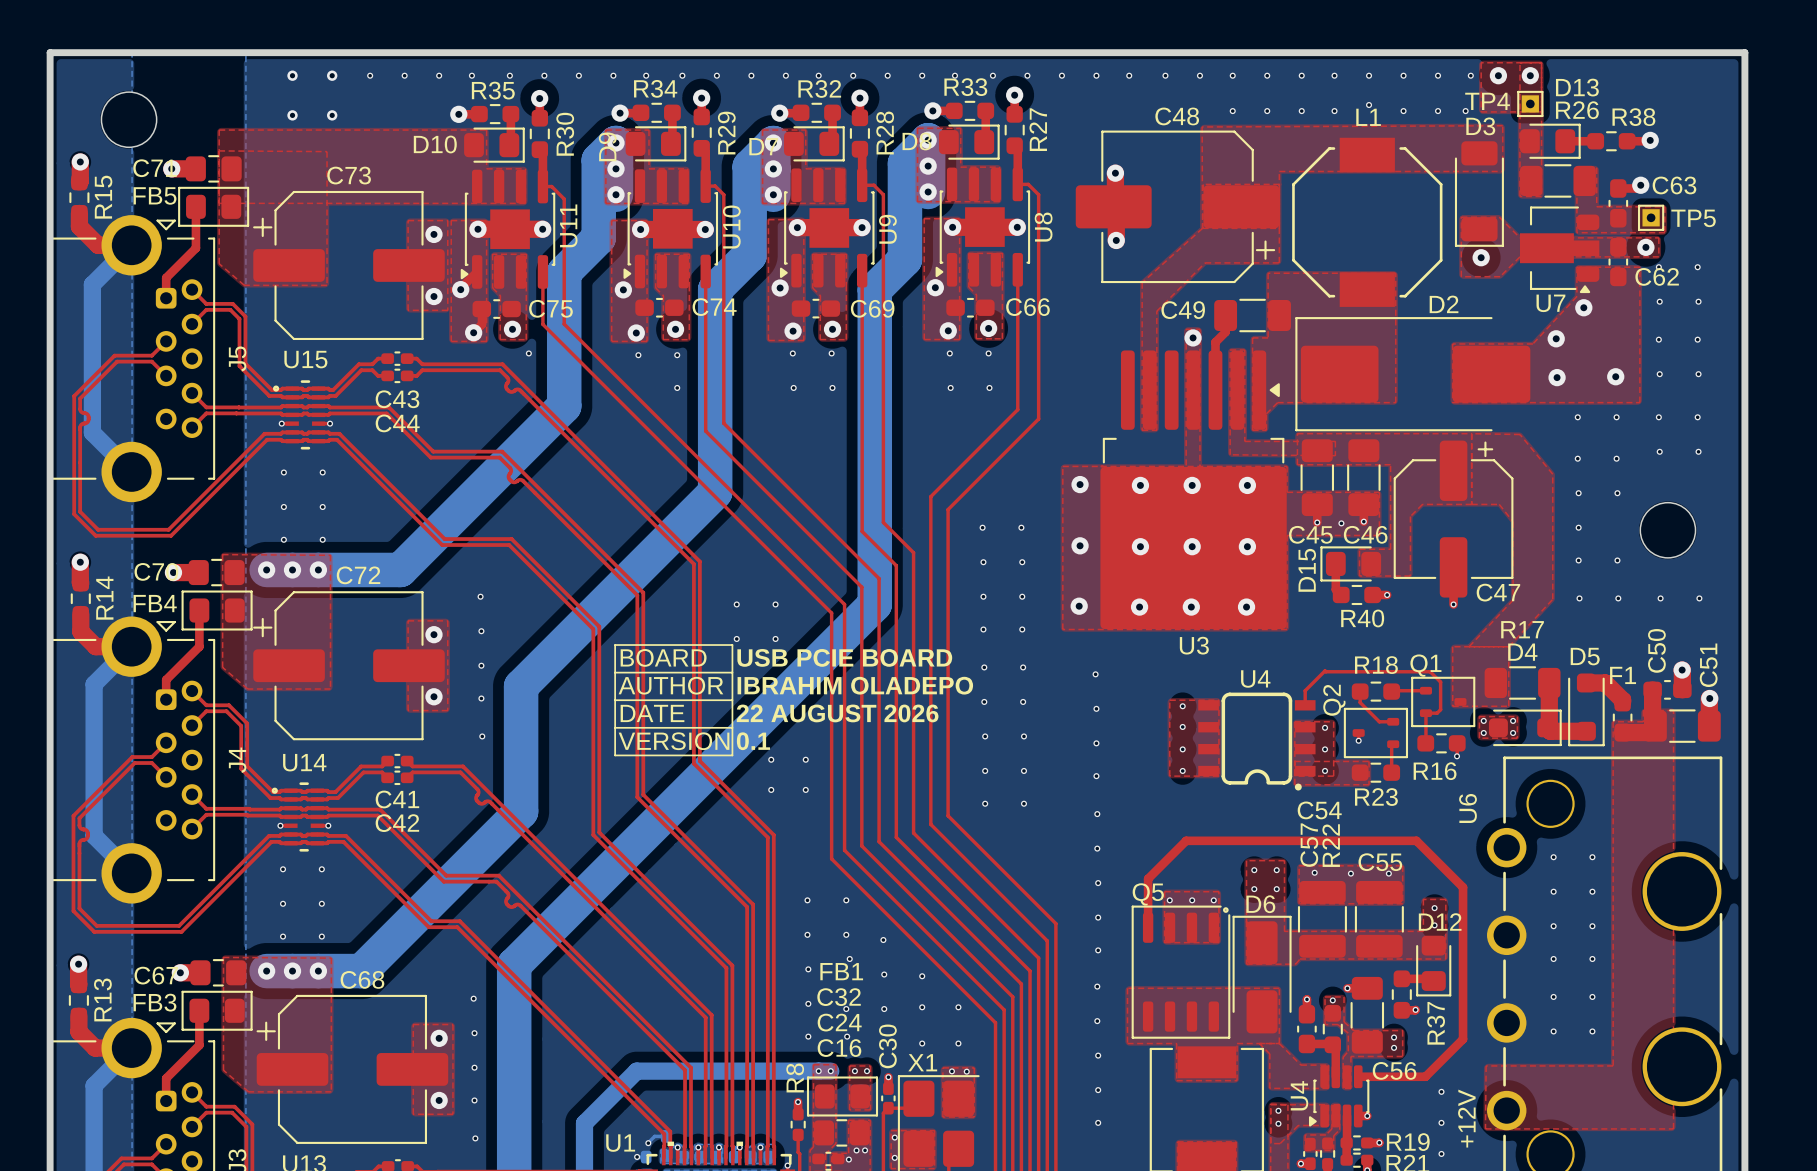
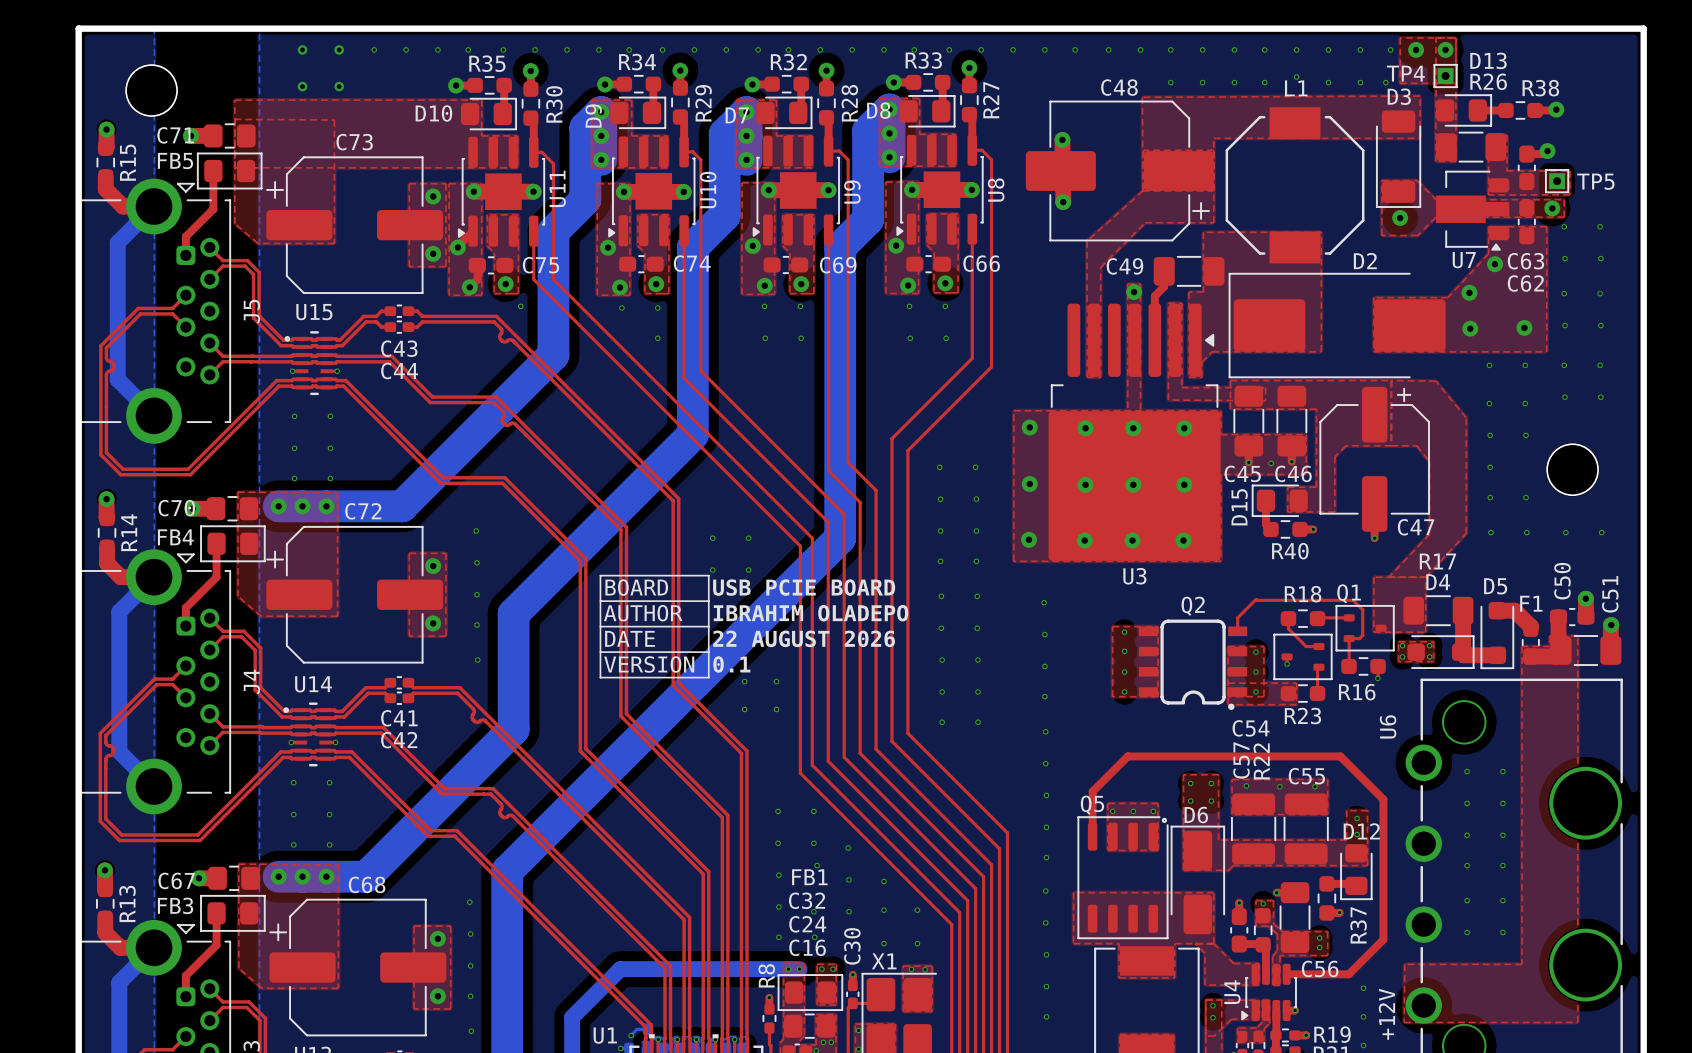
C63 name position: C63 (1674, 185) -> C63 (1525, 261)
C62 name position: C62 (1657, 276) -> C62 (1525, 283)
text: U4 (1255, 679) -> none
Q2 name rotation: 0° (1334, 700) -> 90° clockwise (1193, 606)
Q2 name position: Q2 (1334, 700) -> Q2 (1193, 606)

